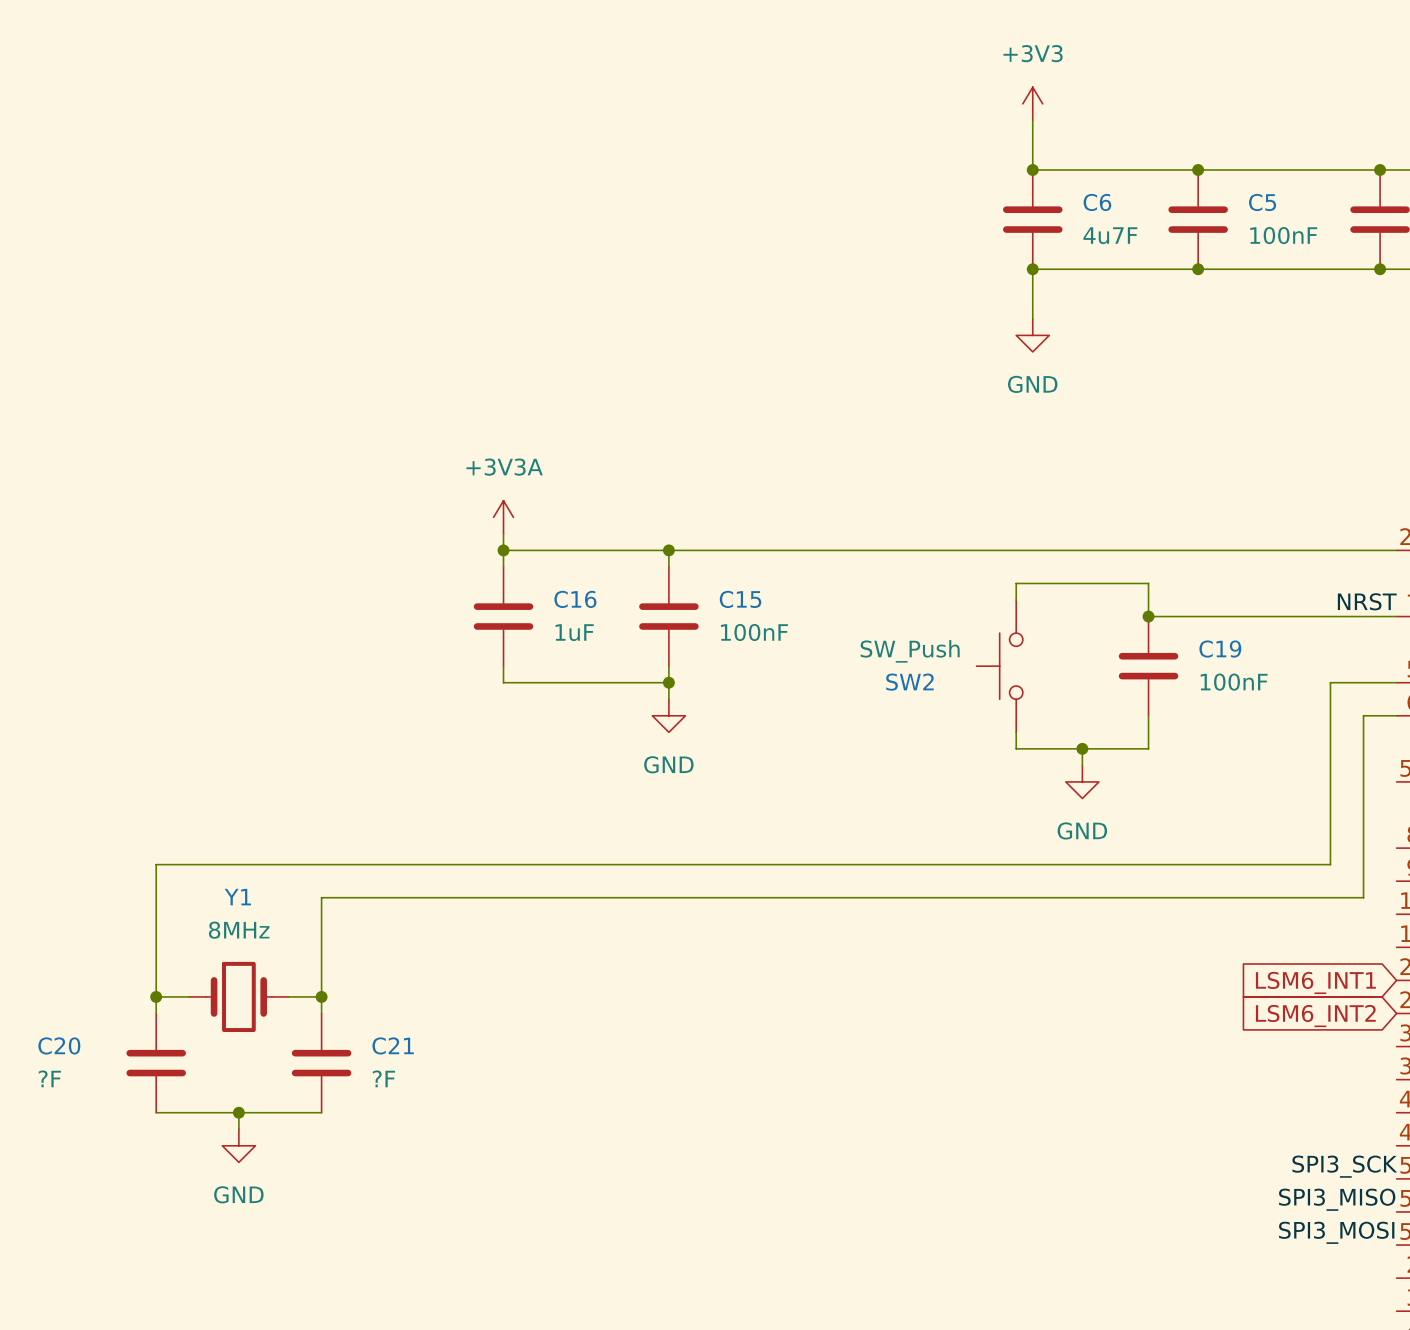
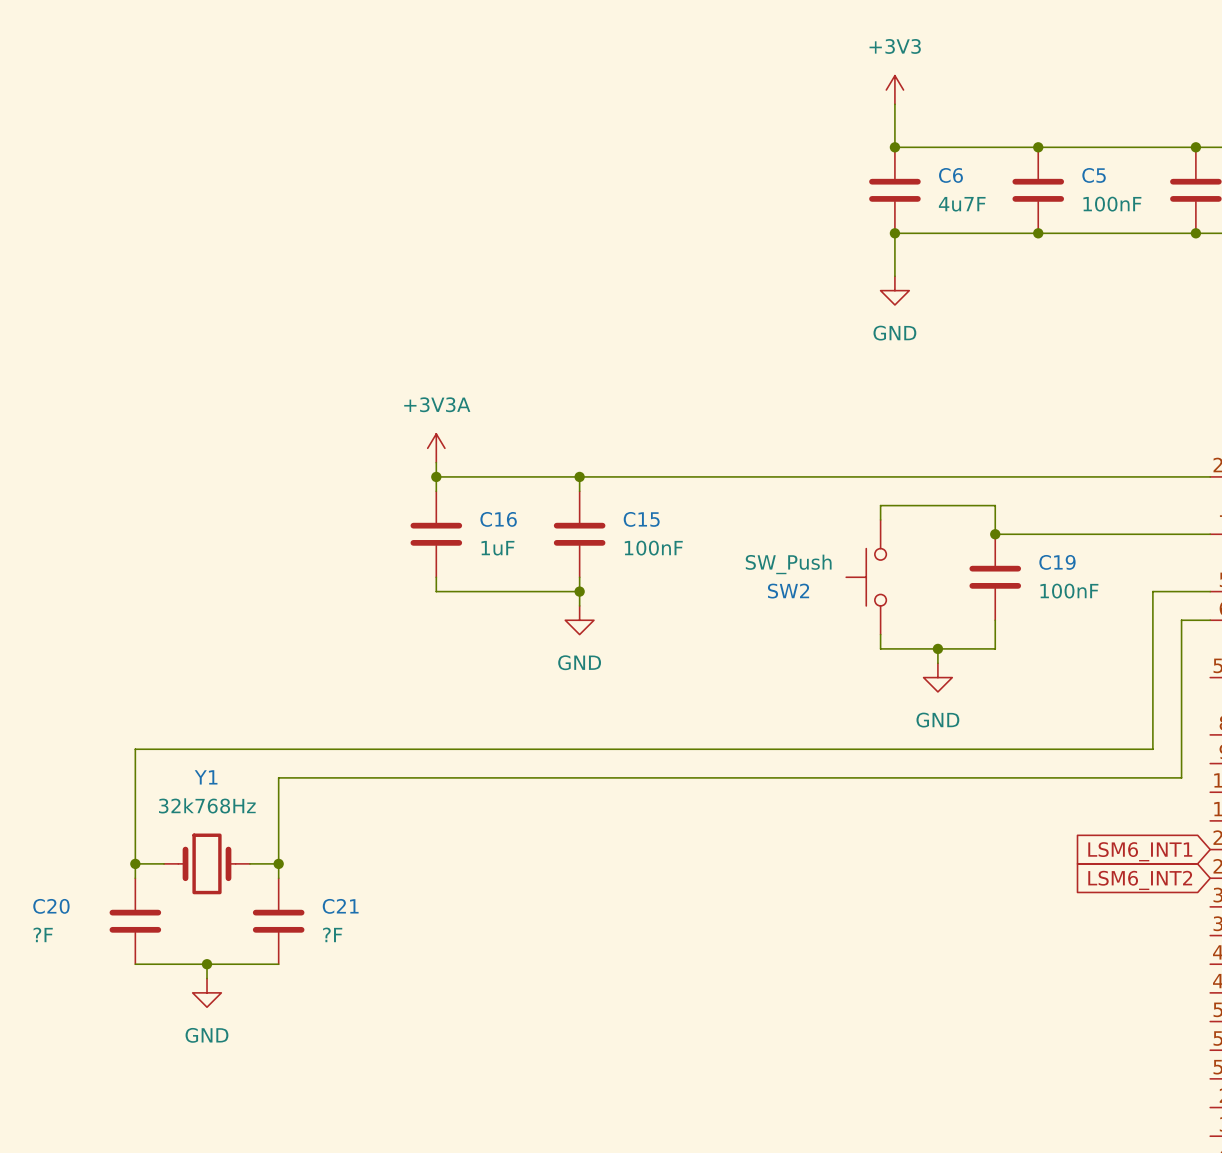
label: NRST (1367, 601) -> none
Y1 value: 8MHz (239, 930) -> 32k768Hz (207, 805)
label: SPI3_SCK (1344, 1166) -> none
label: SPI3_MISO (1337, 1199) -> none
label: SPI3_MOSI (1336, 1232) -> none

